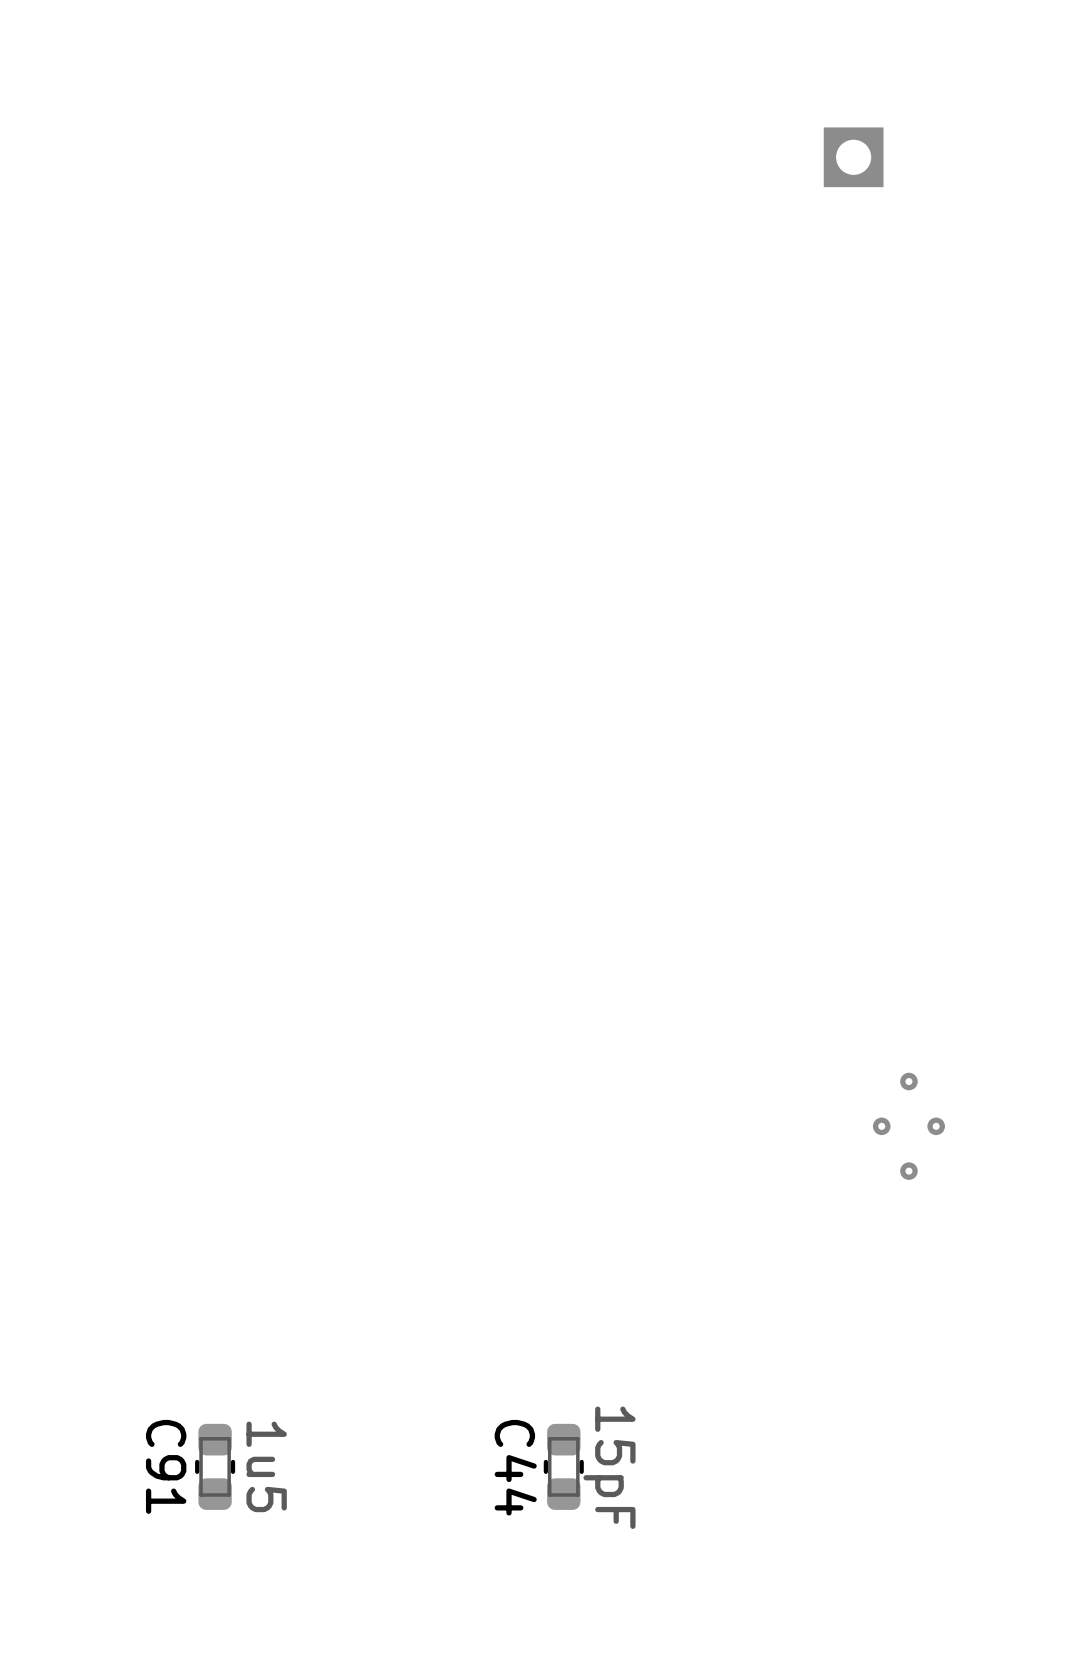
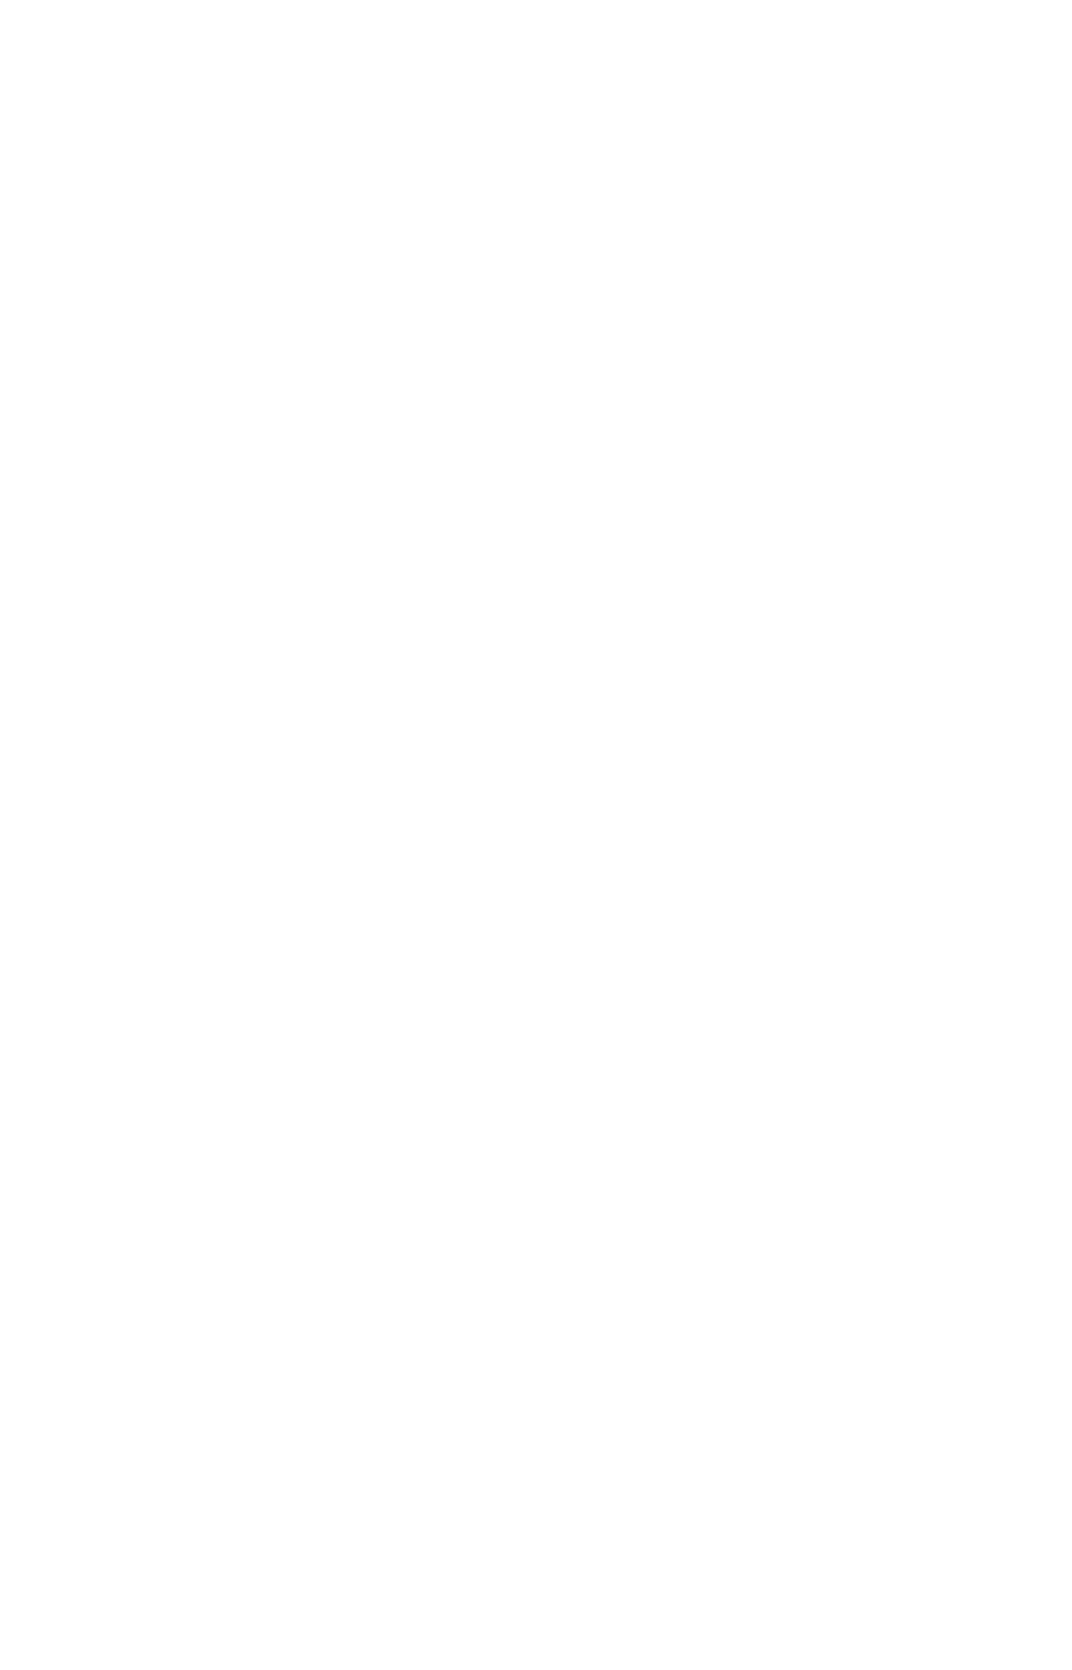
part: (853, 157) -> none
part: (908, 1126) -> none
C91: 1u5 (215, 1466) -> none
C44: 15pF (563, 1466) -> none

